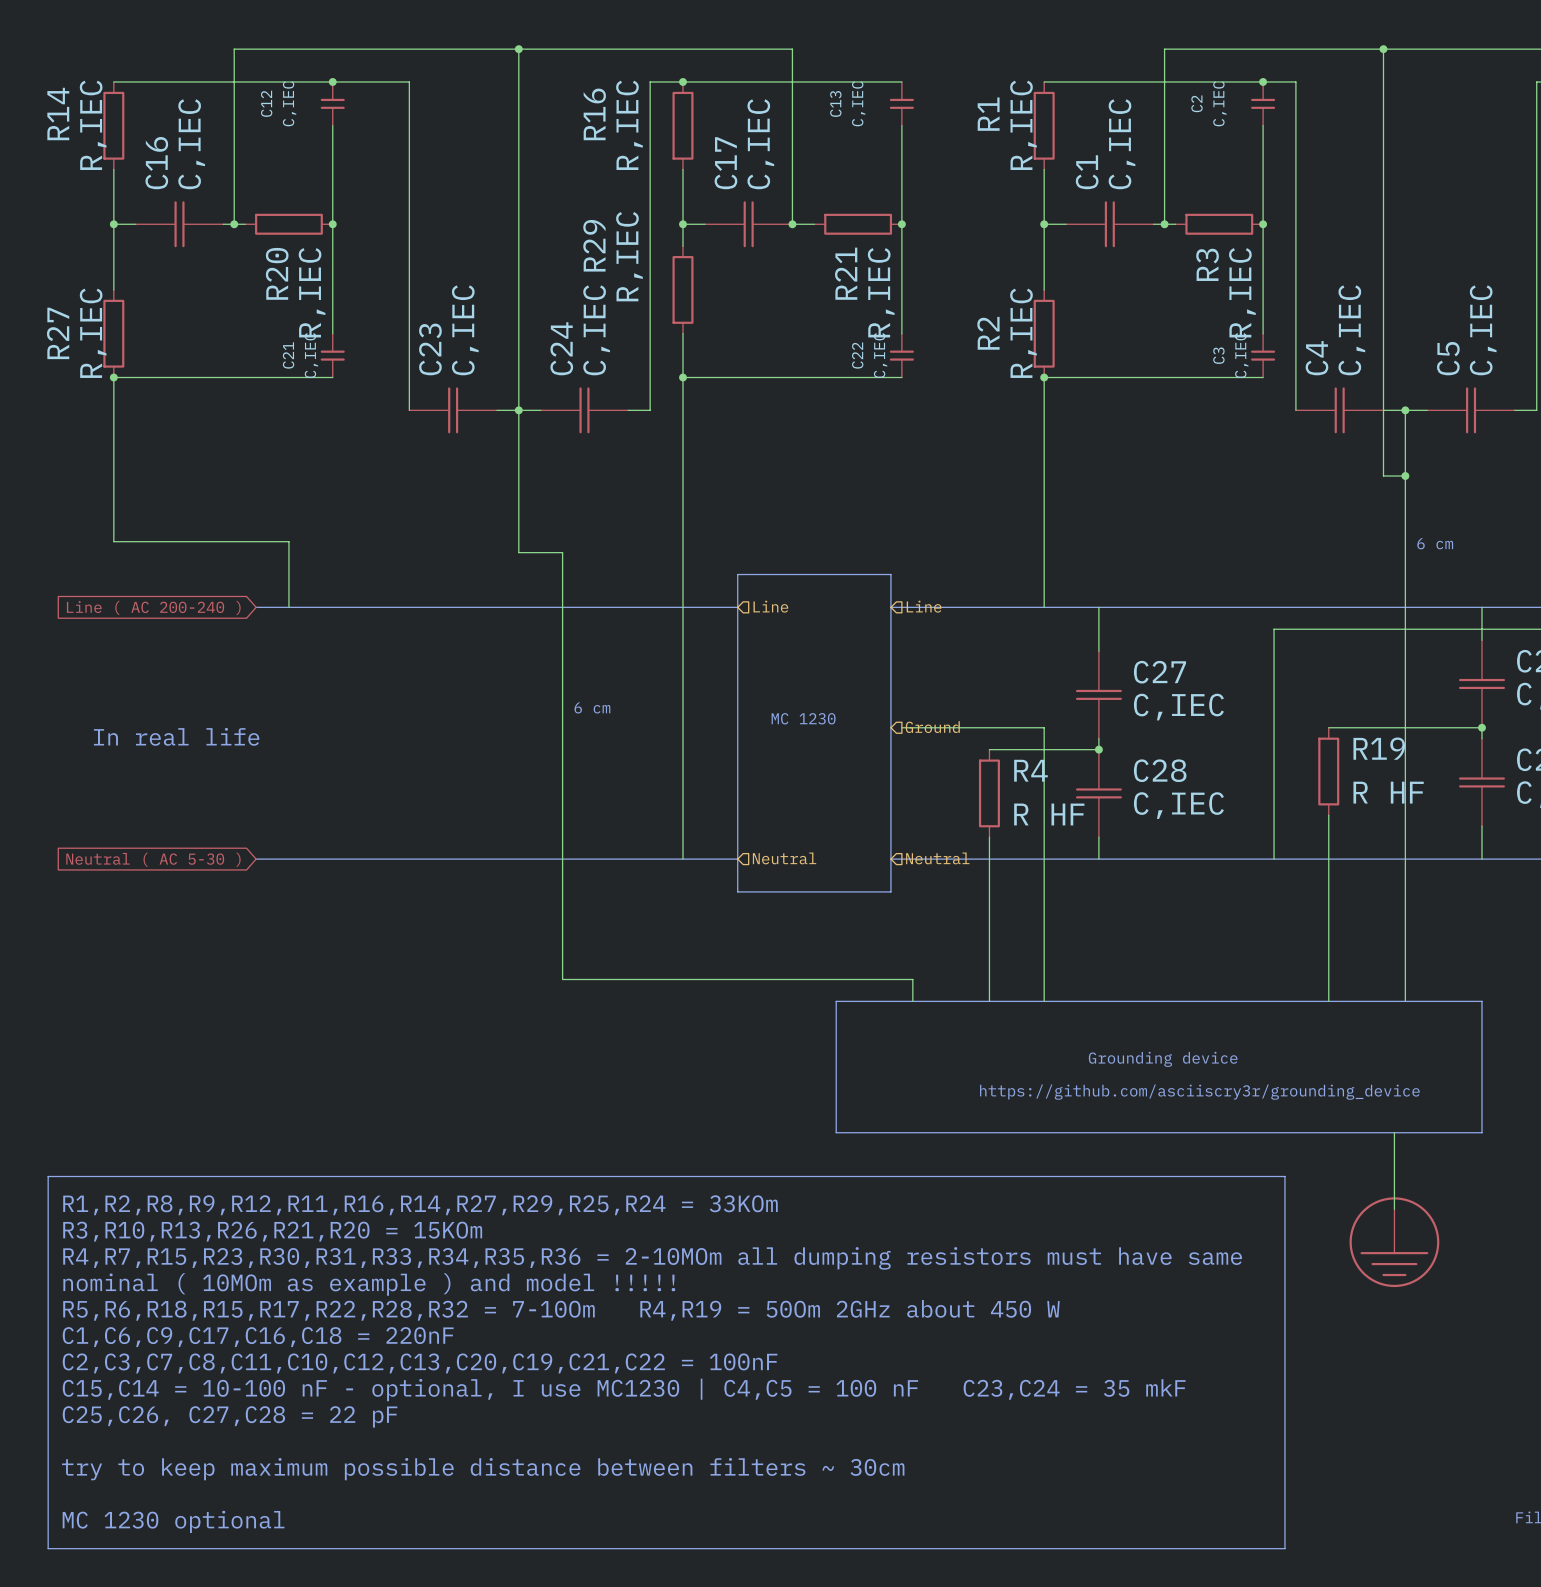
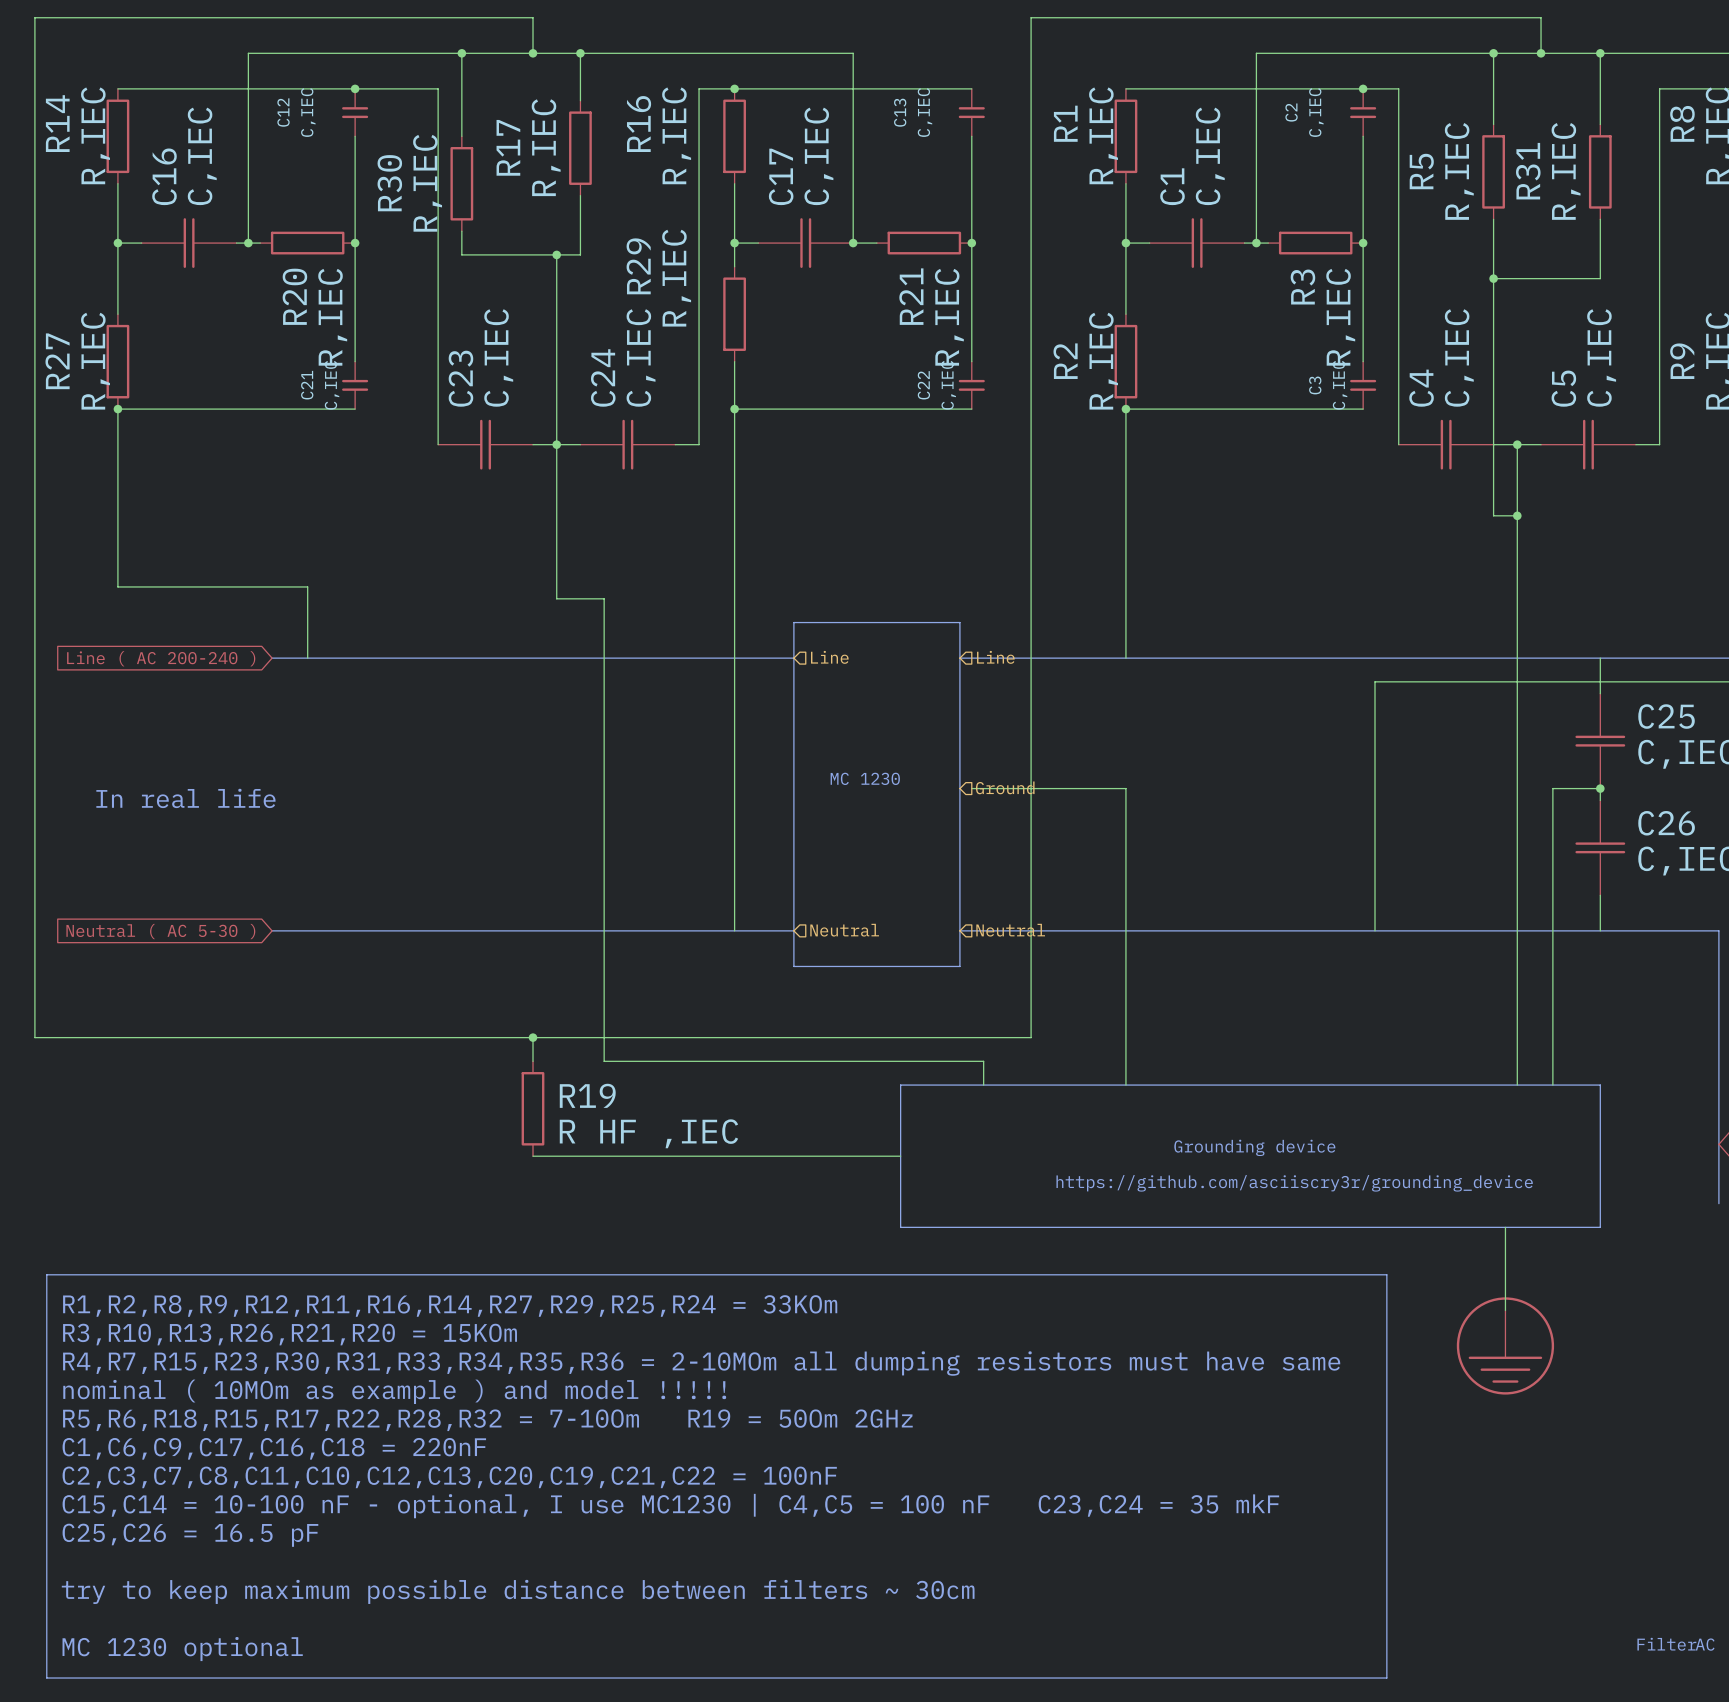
wire: none -> (461, 53) (461, 136)
junction: none -> (461, 53)
wire: none -> (533, 53) (533, 17) (34, 17) (34, 1037) (1031, 1037) (1031, 17) (1541, 17) (1541, 53)
junction: none -> (533, 53)
wire: (518, 49) (518, 235) -> none
junction: (518, 49) -> none
wire: none -> (580, 53) (580, 100)
junction: none -> (580, 53)
junction: none -> (1541, 53)
wire: none -> (1600, 53) (1600, 124)
junction: none -> (1600, 53)
wire: (1383, 114) (1383, 202) -> none
R17: none -> R,IEC (580, 148)
R5: none -> R,IEC (1493, 171)
R31: none -> R,IEC (1600, 171)
R30: none -> R,IEC (461, 183)
wire: none -> (580, 195) (580, 254) (461, 254) (461, 231)
wire: none -> (1600, 219) (1600, 278) (1493, 278)
junction: none -> (556, 254)
junction: none -> (1493, 278)
text: 6 cm (1435, 543) -> none
wire: (1098, 607) (1098, 651) -> none
C27: C,IEC (1098, 694) -> none
text: 6 cm (592, 707) -> none
wire: (1328, 727) (1438, 727) -> (1552, 1085) (1552, 788)
wire: (1098, 738) (1098, 749) (989, 749) -> none
R19 name position: R19 (1379, 748) -> R19 (587, 1095)
junction: (1098, 749) -> none
R19 position: (1328, 771) -> (533, 1108)
R19 value: R HF (1388, 792) -> R HF ,IEC (648, 1133)
R4: R HF (989, 793) -> none
C28: C,IEC (1098, 793) -> none
wire: (1328, 815) (1328, 1001) -> none
wire: (989, 837) (989, 1001) -> none
wire: (1098, 837) (1098, 859) -> none
wire: none -> (533, 1037) (533, 1061)
junction: none -> (533, 1037)
wire: none -> (533, 1156) (900, 1156)
text: R5,R6,R18,R15,R17,R22,R28,R32 = 7-10Om R4,R19 = 50Om 2GHz about 450 W (561, 1310) -> R5,R6,R18,R15,R17,R22,R28,R32 = 7-10Om R19 = 50Om 2GHz (487, 1420)
text: C25,C26, C27,C28 = 22 pF (230, 1416) -> C25,C26 = 16.5 pF (190, 1535)

